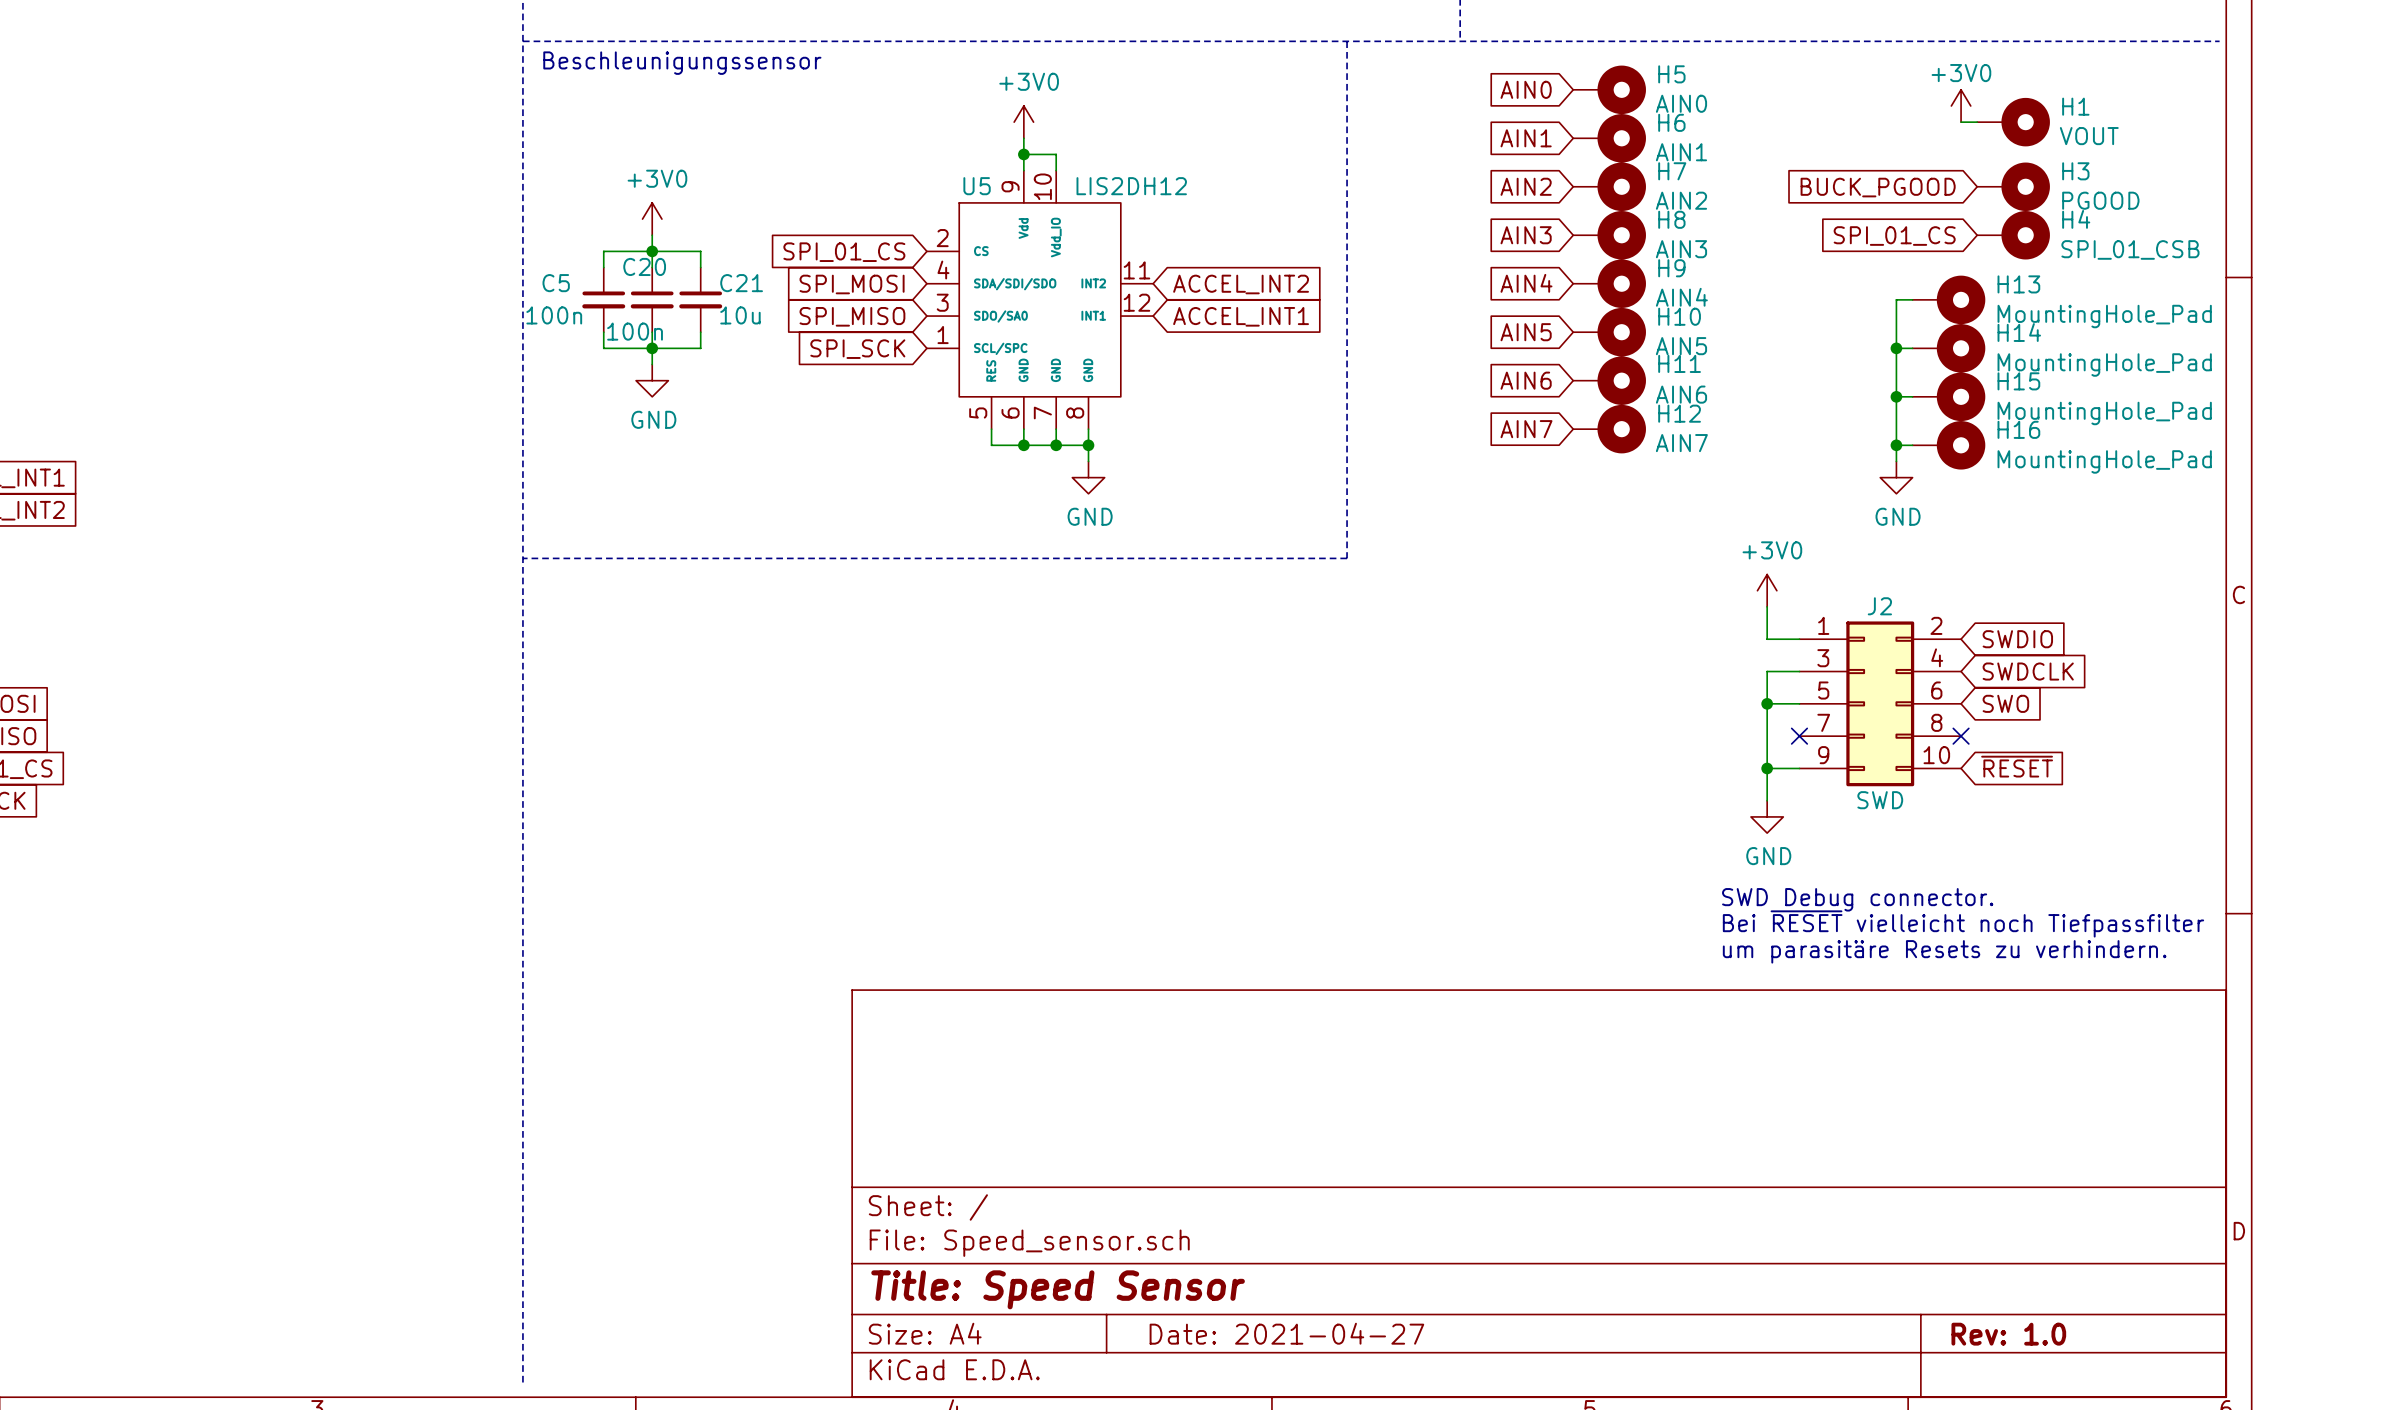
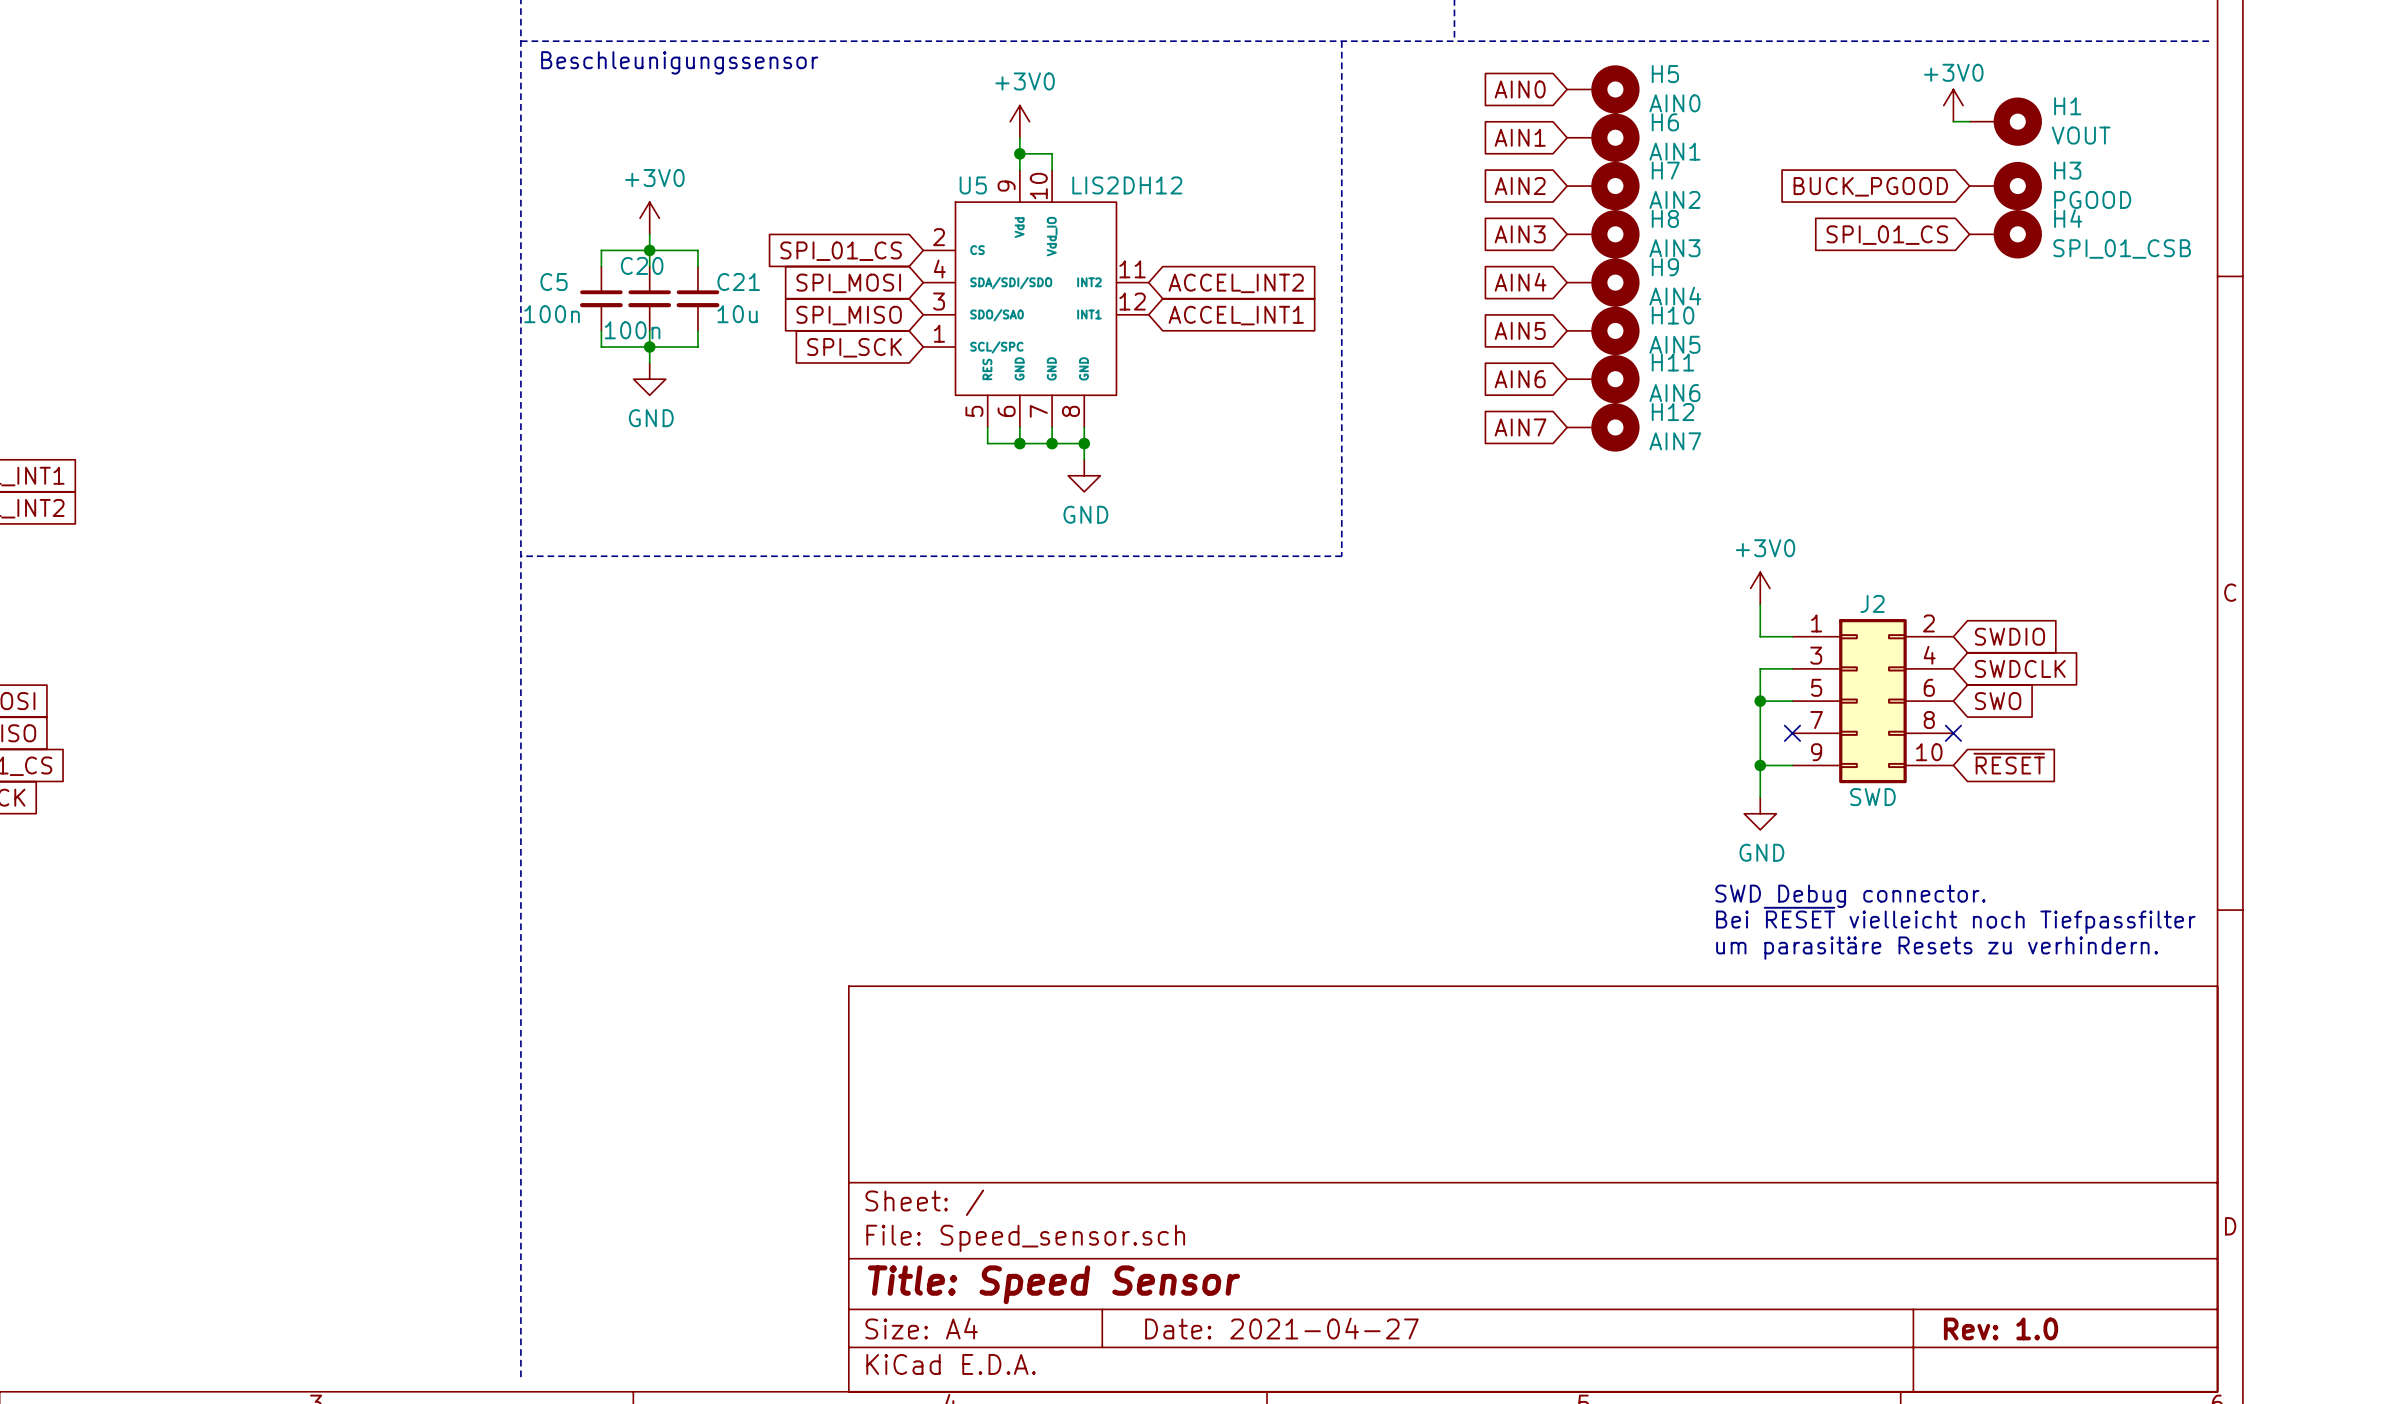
wire: (1912, 299) (1896, 299) (1896, 461) -> none
H13: MountingHole_Pad (1948, 299) -> none
wire: (1896, 348) (1912, 348) -> none
junction: (1896, 348) -> none
H14: MountingHole_Pad (1948, 348) -> none
wire: (1896, 396) (1912, 396) -> none
junction: (1896, 396) -> none
H15: MountingHole_Pad (1948, 396) -> none
wire: (1896, 445) (1912, 445) -> none
junction: (1896, 445) -> none
H16: MountingHole_Pad (1948, 445) -> none
power symbol: GND (1896, 477) -> none

